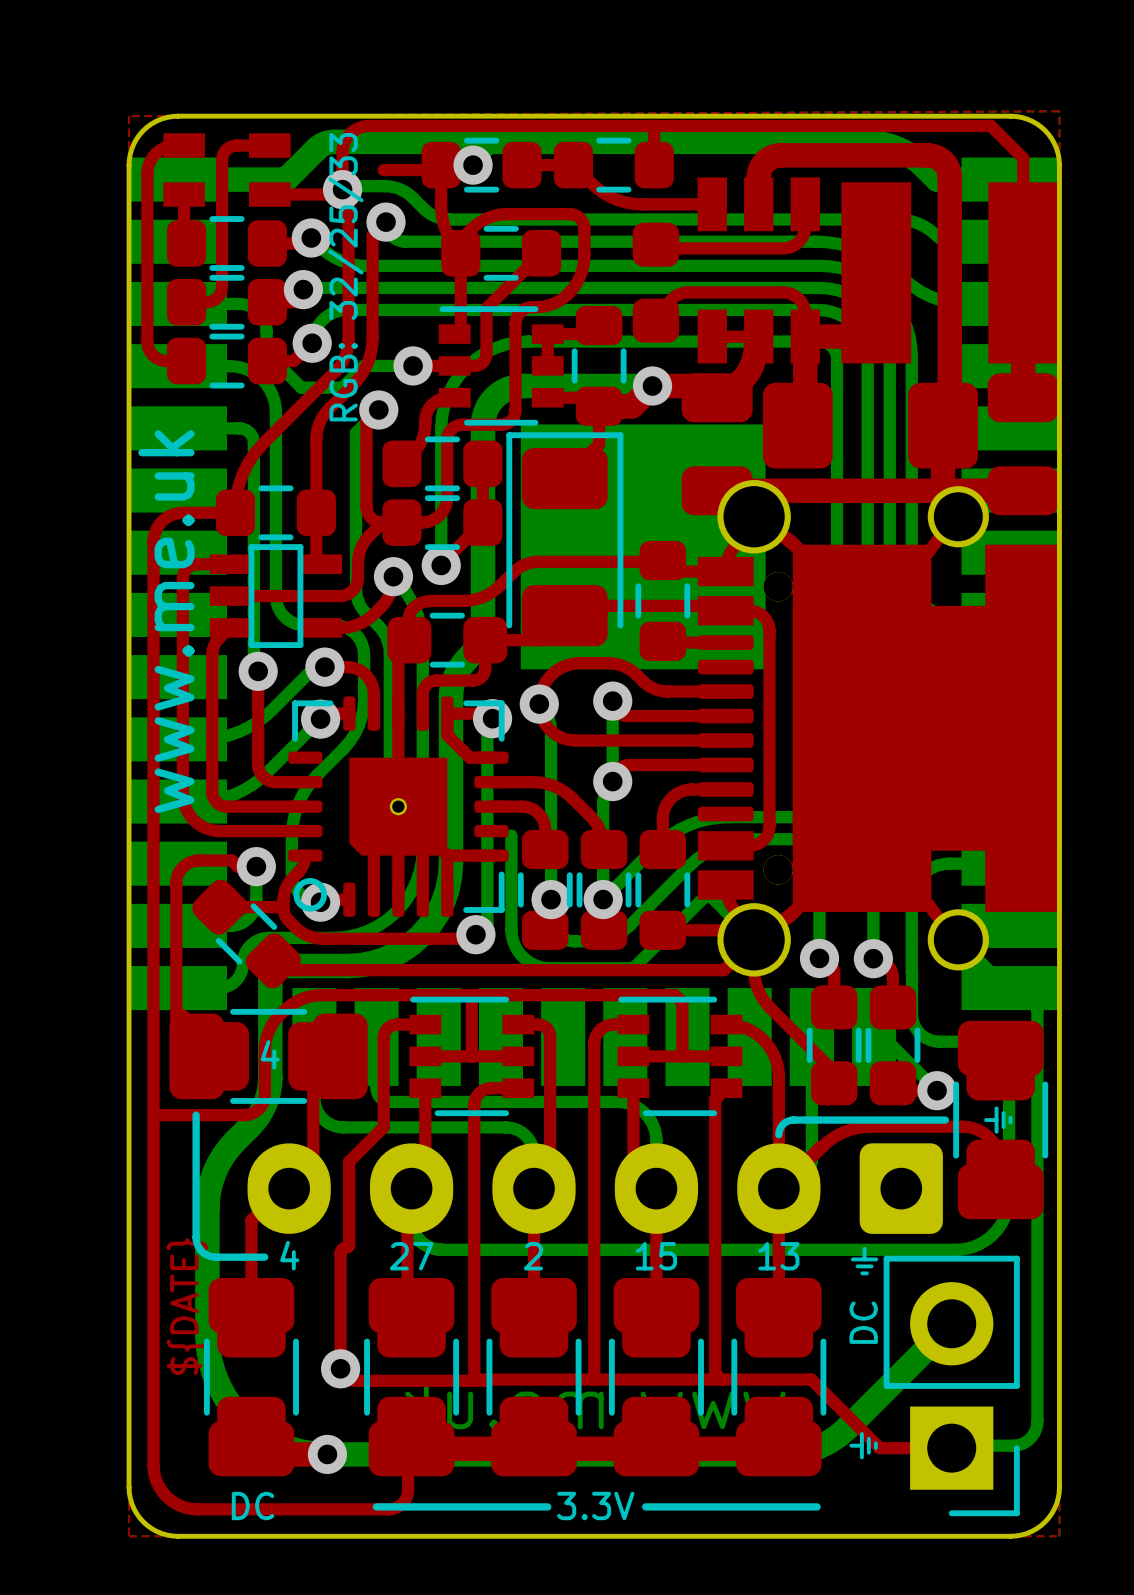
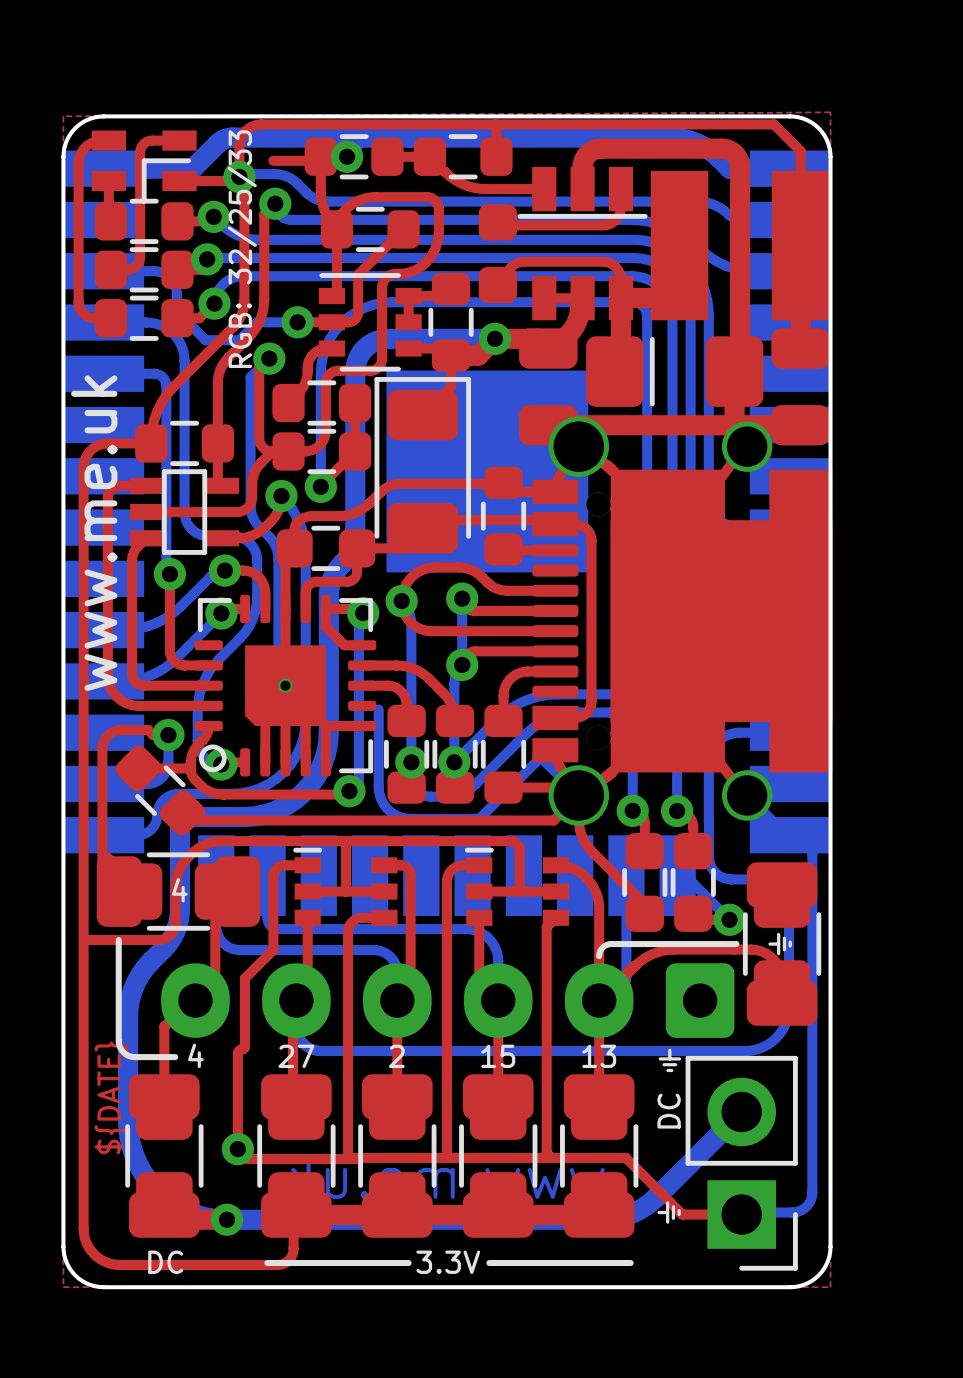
part footprint: [163, 133, 291, 207] -> [91, 130, 197, 204]
part footprint: [632, 143, 1059, 516] -> [478, 138, 830, 446]
part footprint: [409, 996, 535, 1117] -> [293, 847, 398, 926]
part footprint: [617, 996, 743, 1117] -> [464, 847, 570, 926]

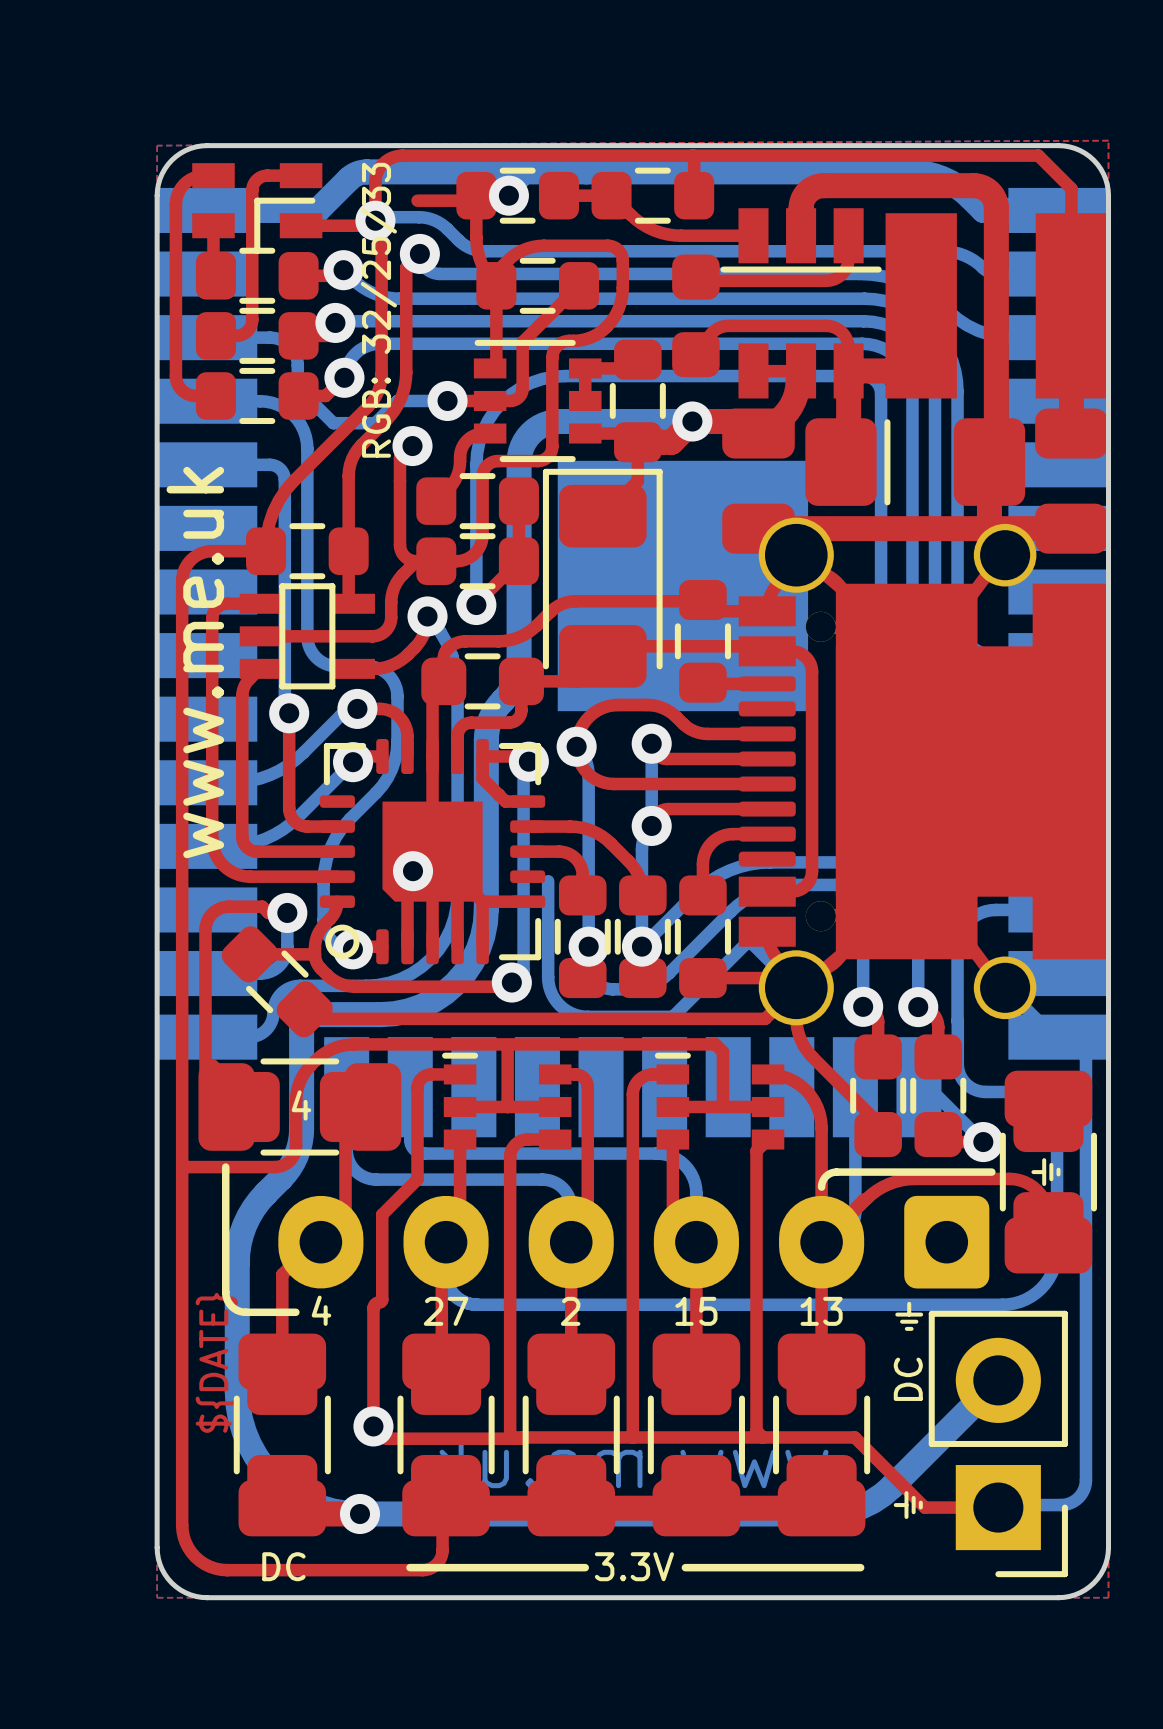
bottom track: (269, 358) (250, 377) (250, 509) (255, 522) (272, 541) (277, 553) (278, 678) (285, 685) -> none
part footprint: [194, 594, 377, 777] -> [319, 738, 546, 965]
via: none -> (413, 871)

